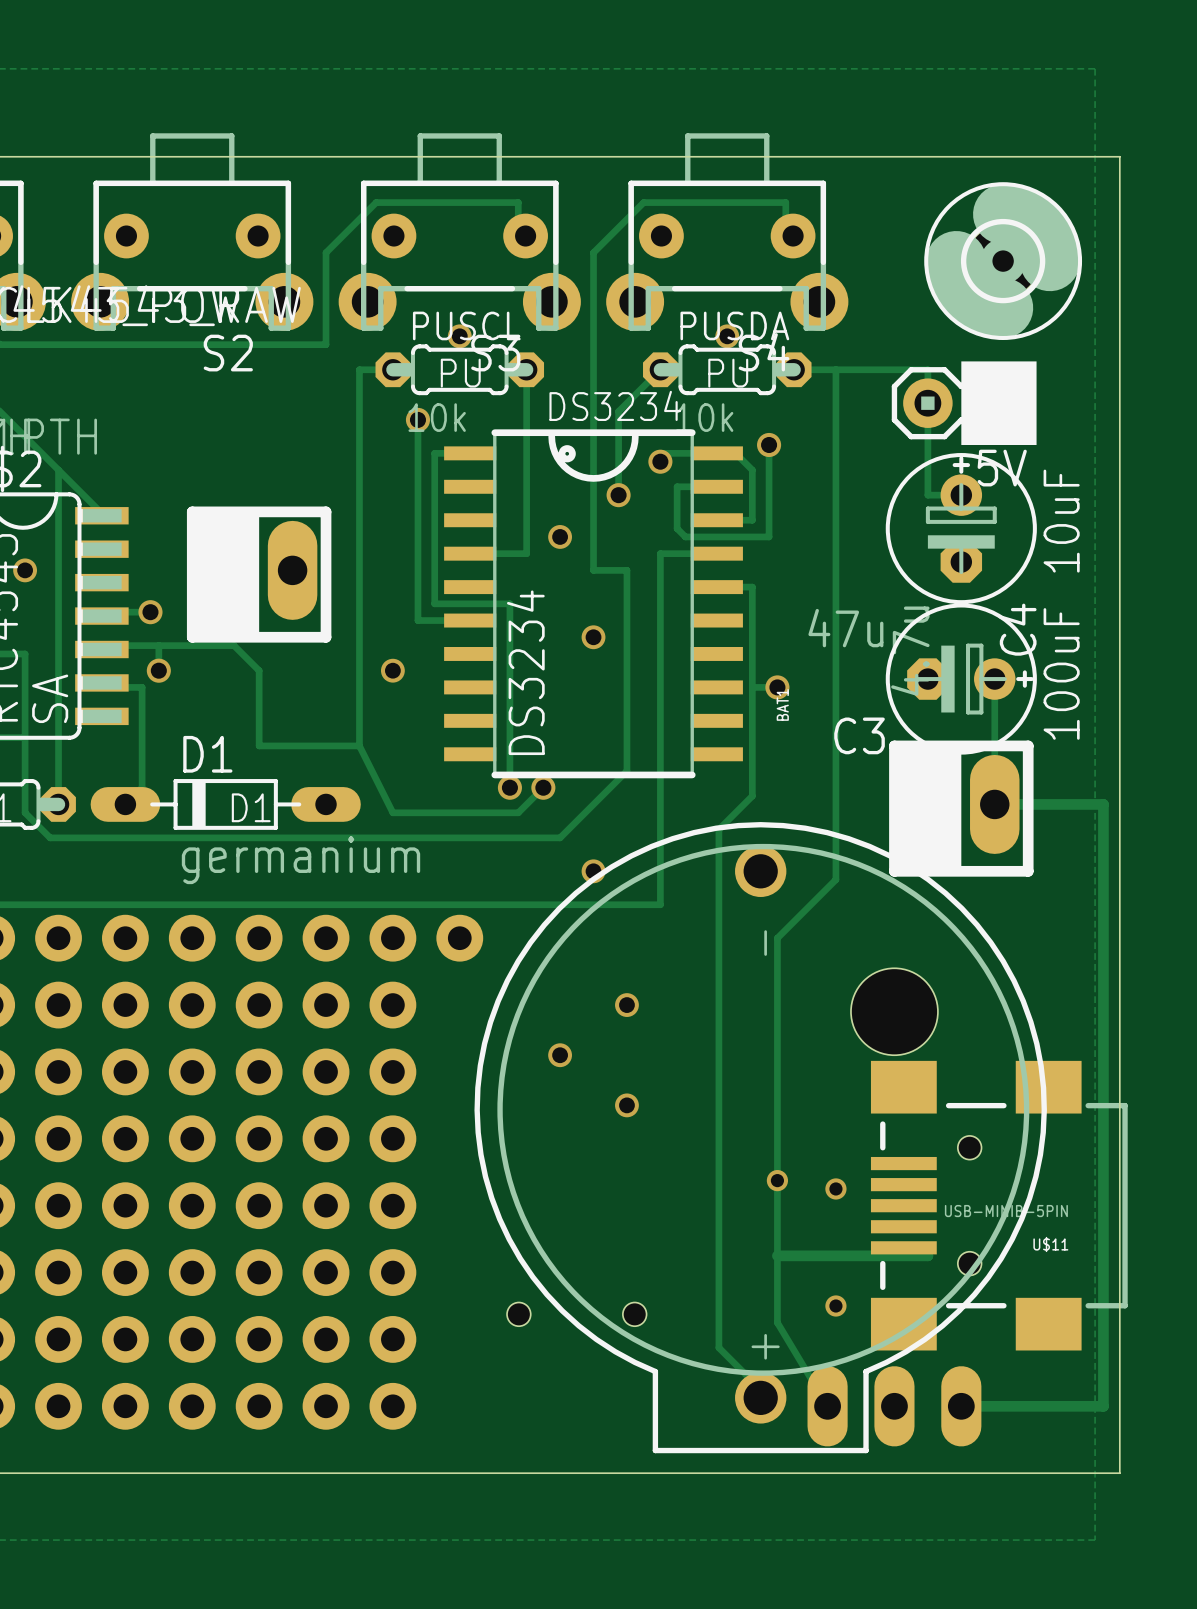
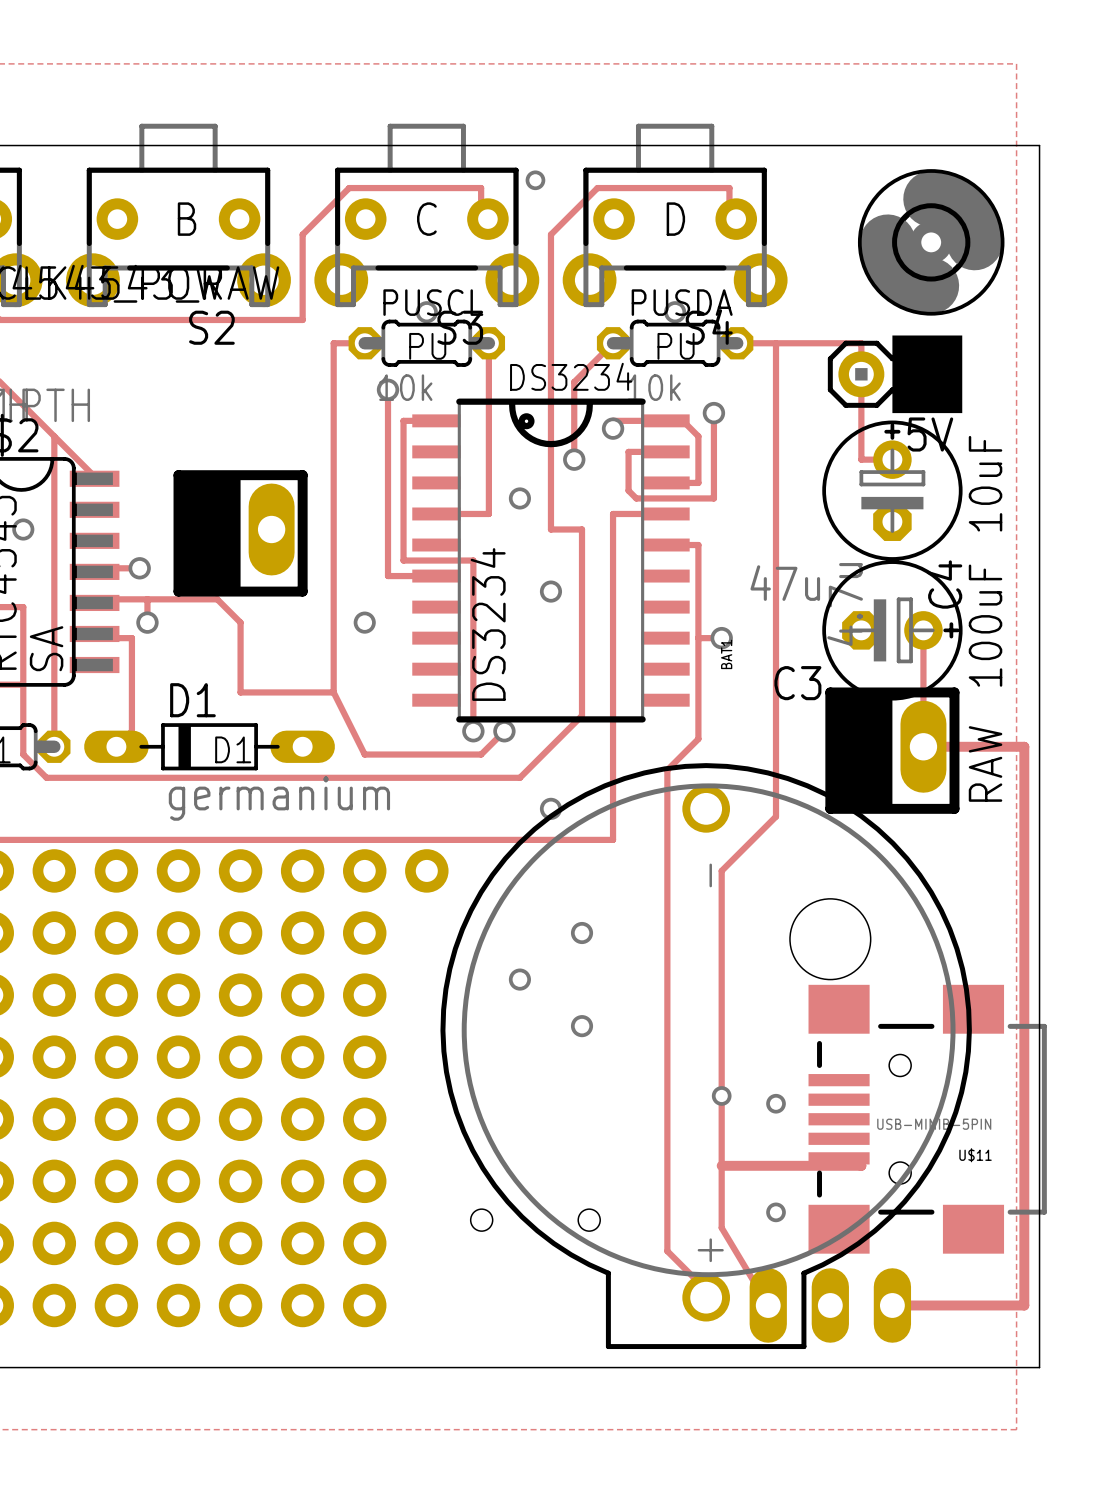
via: none -> (535, 180)
text: none -> B (187, 219)
text: none -> C (426, 219)
text: none -> D (675, 219)
text: none -> RAW (985, 763)

